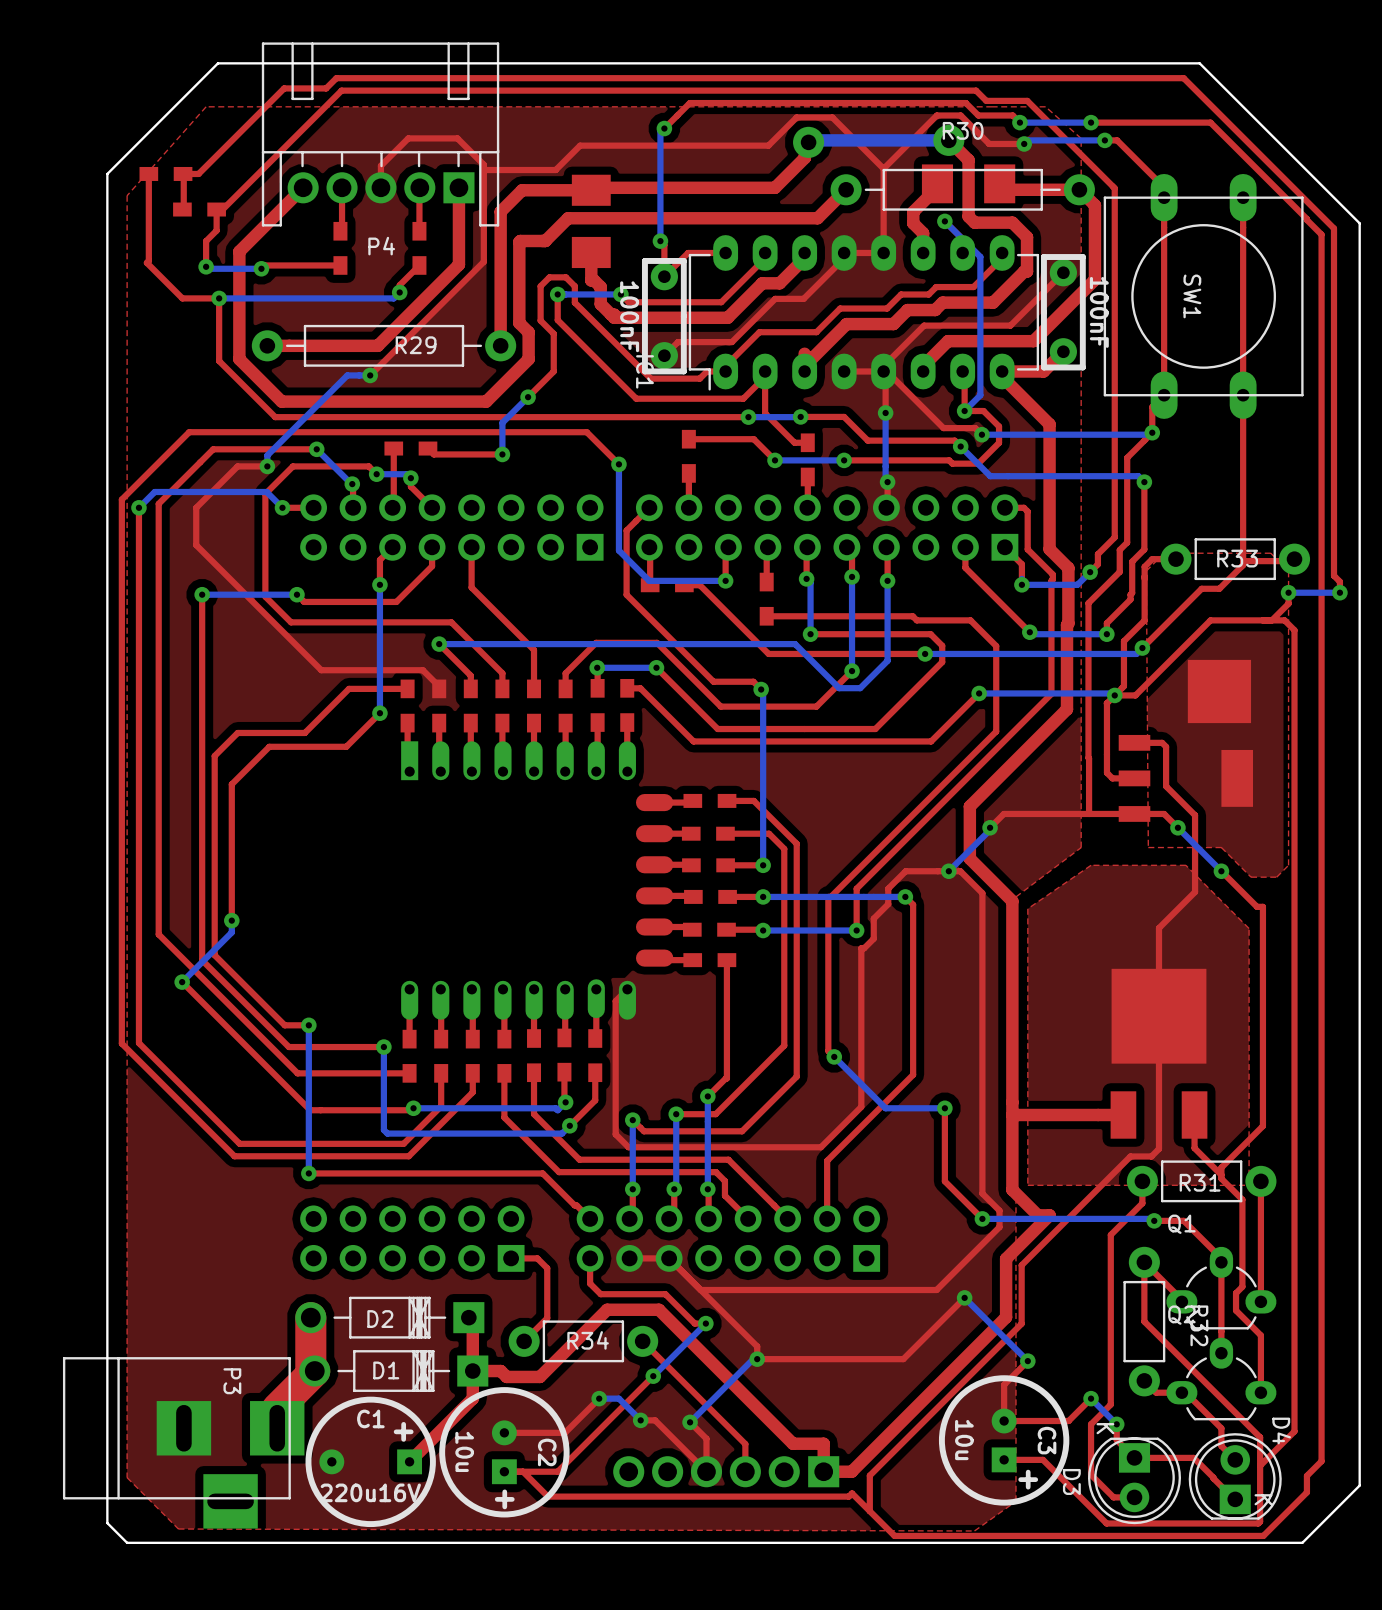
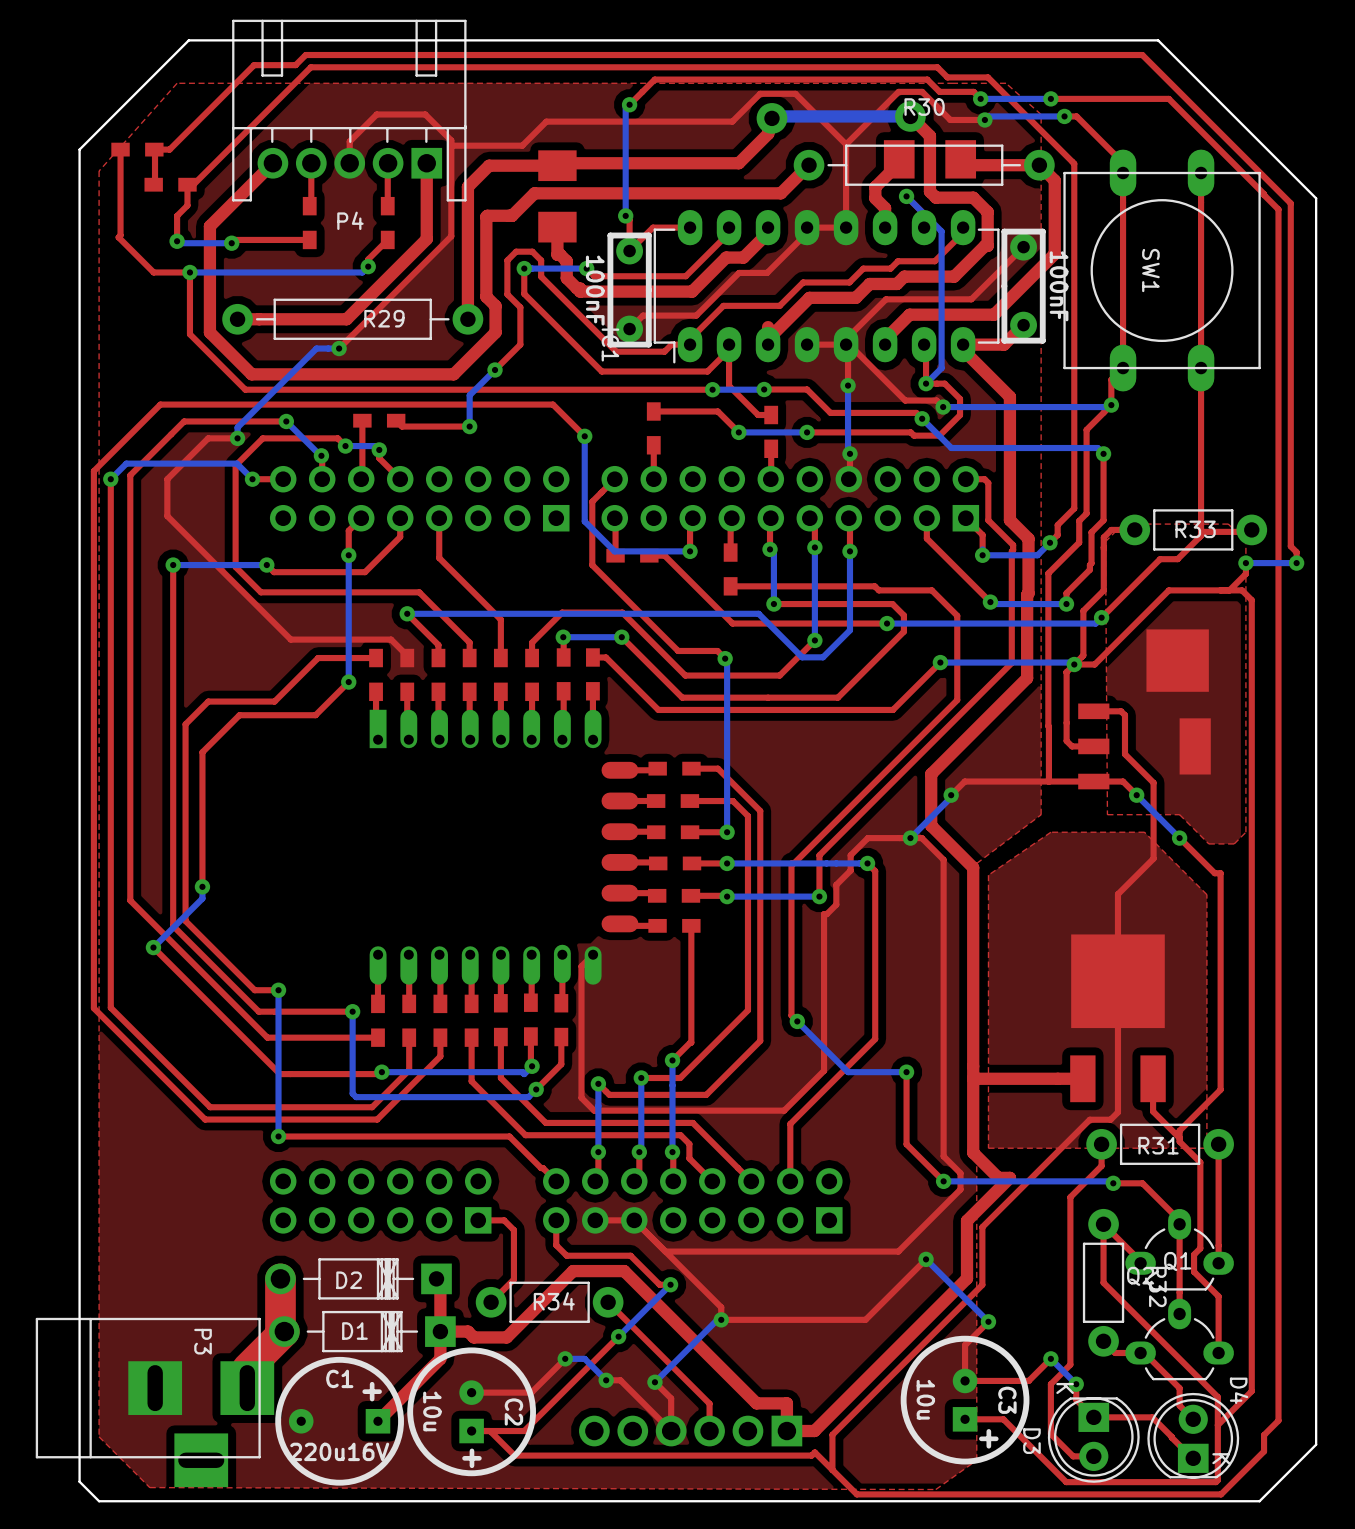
Q1 name position: Q1 (1181, 1224) -> Q1 (1177, 1261)

